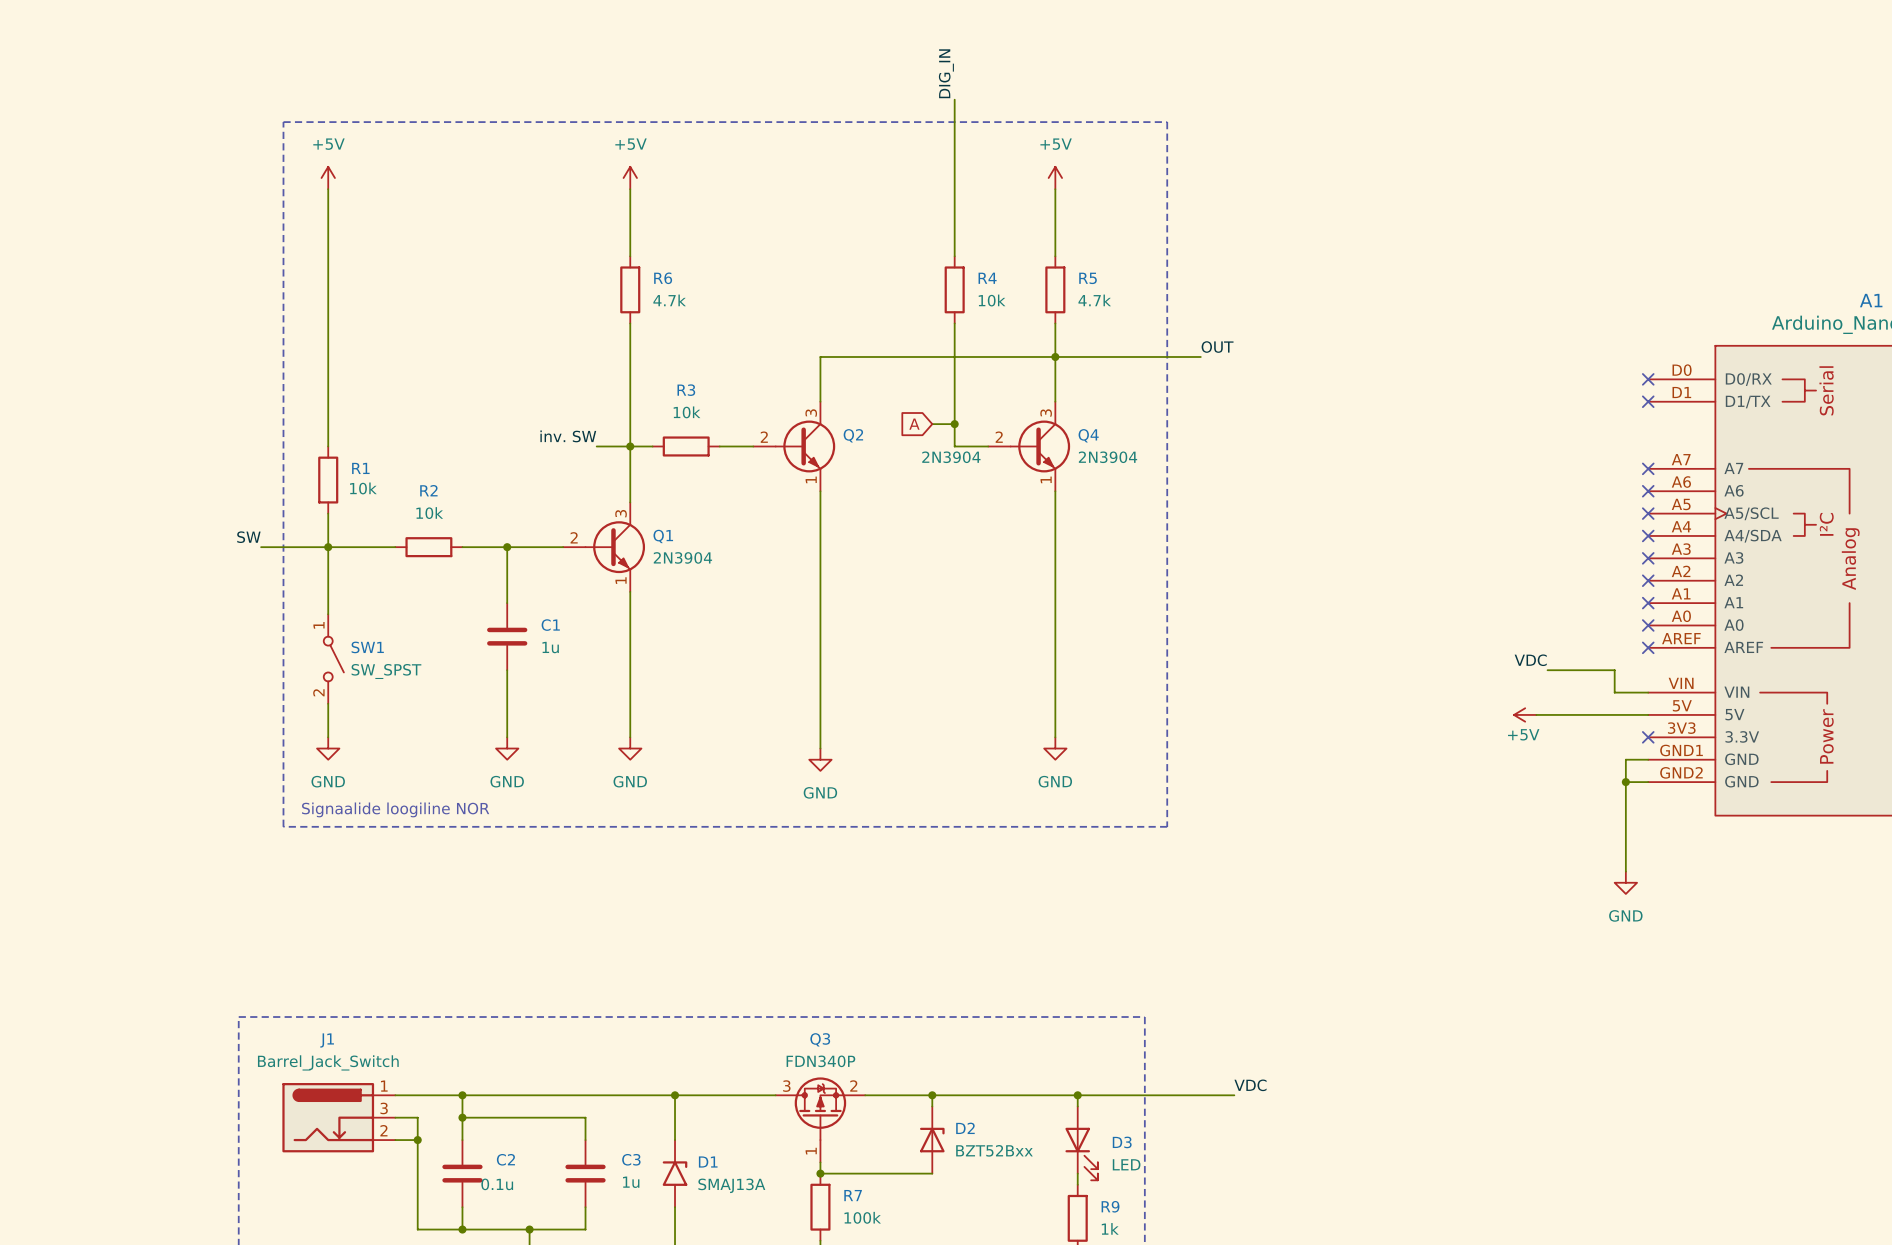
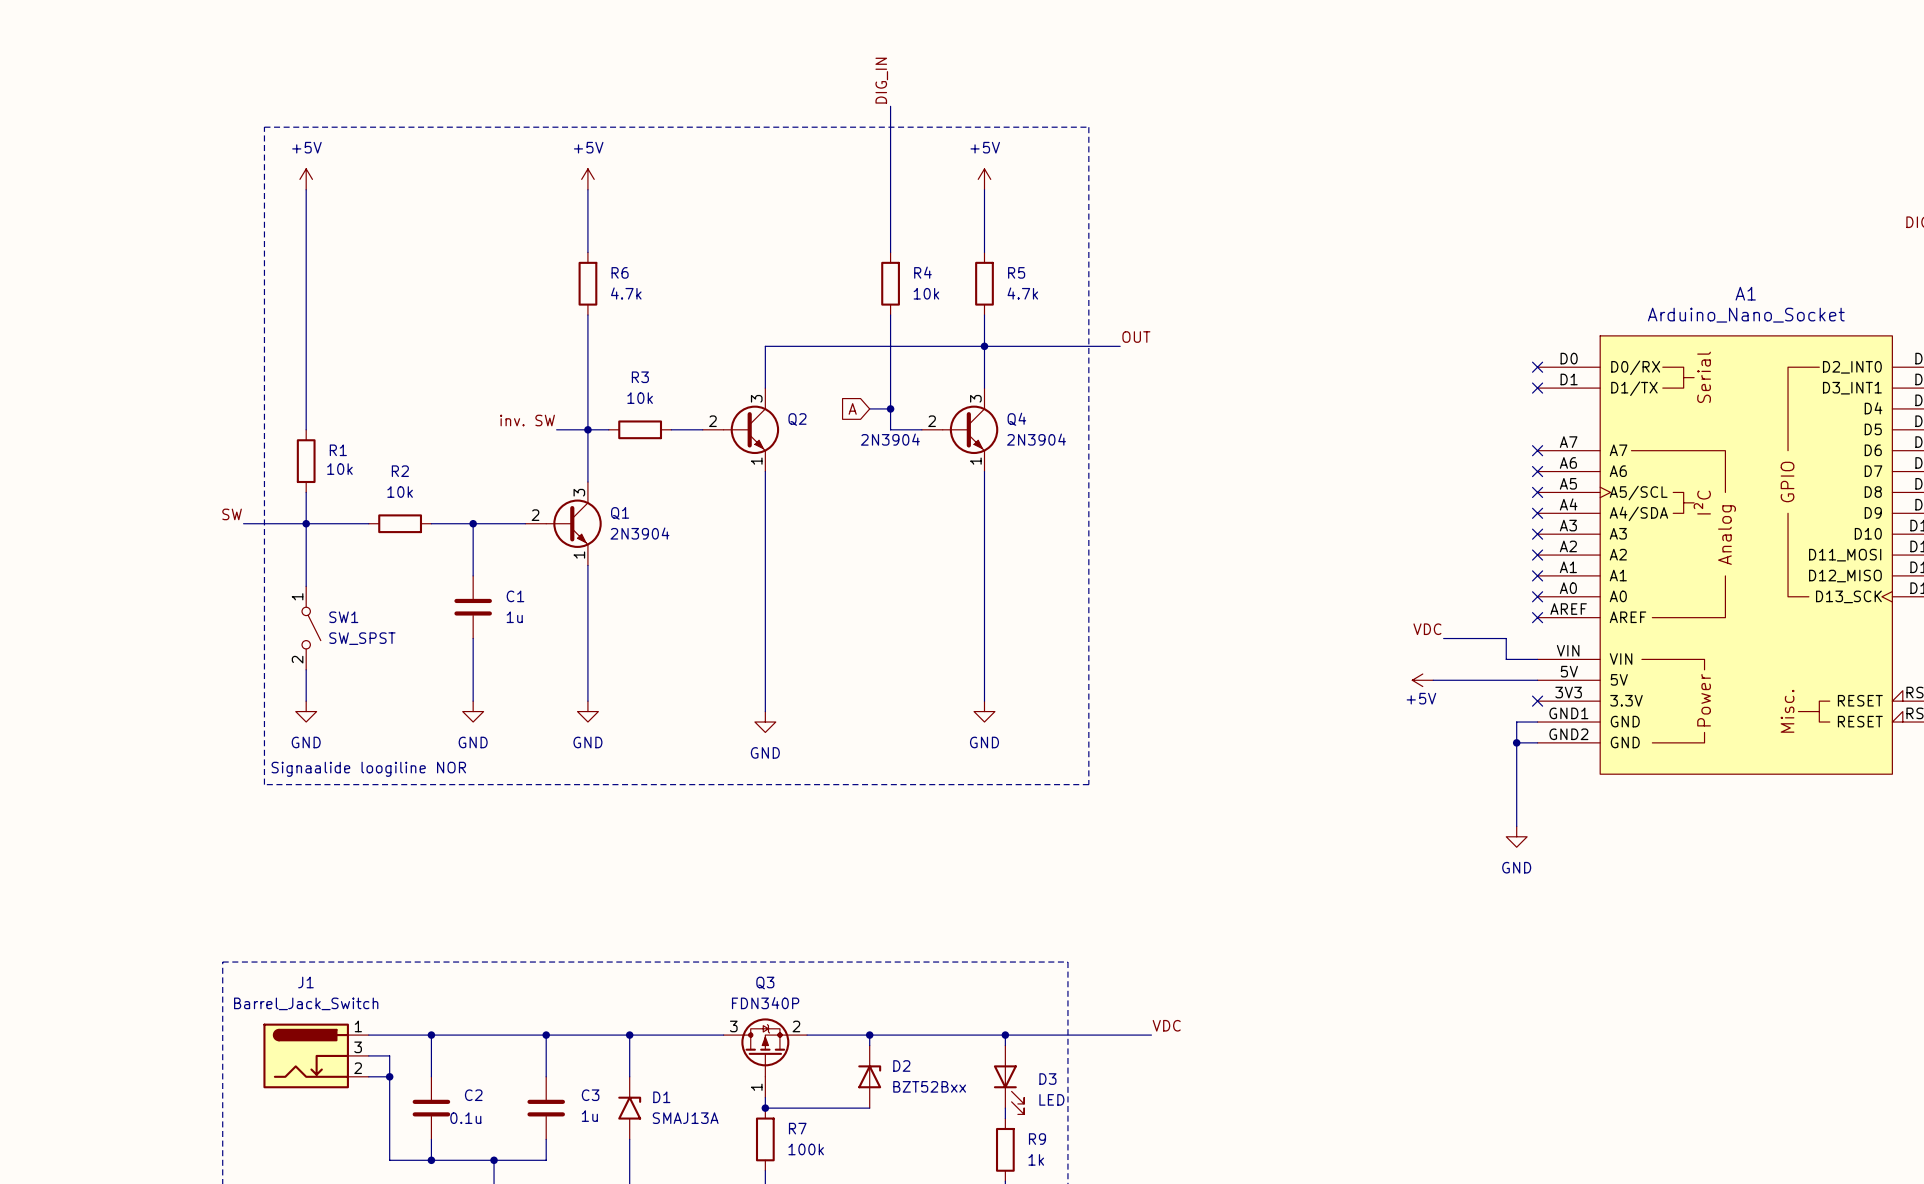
junction: none -> (546, 1035)
wire: (462, 1117) (585, 1117) -> (546, 1035) (546, 1055)
junction: (462, 1117) -> none

